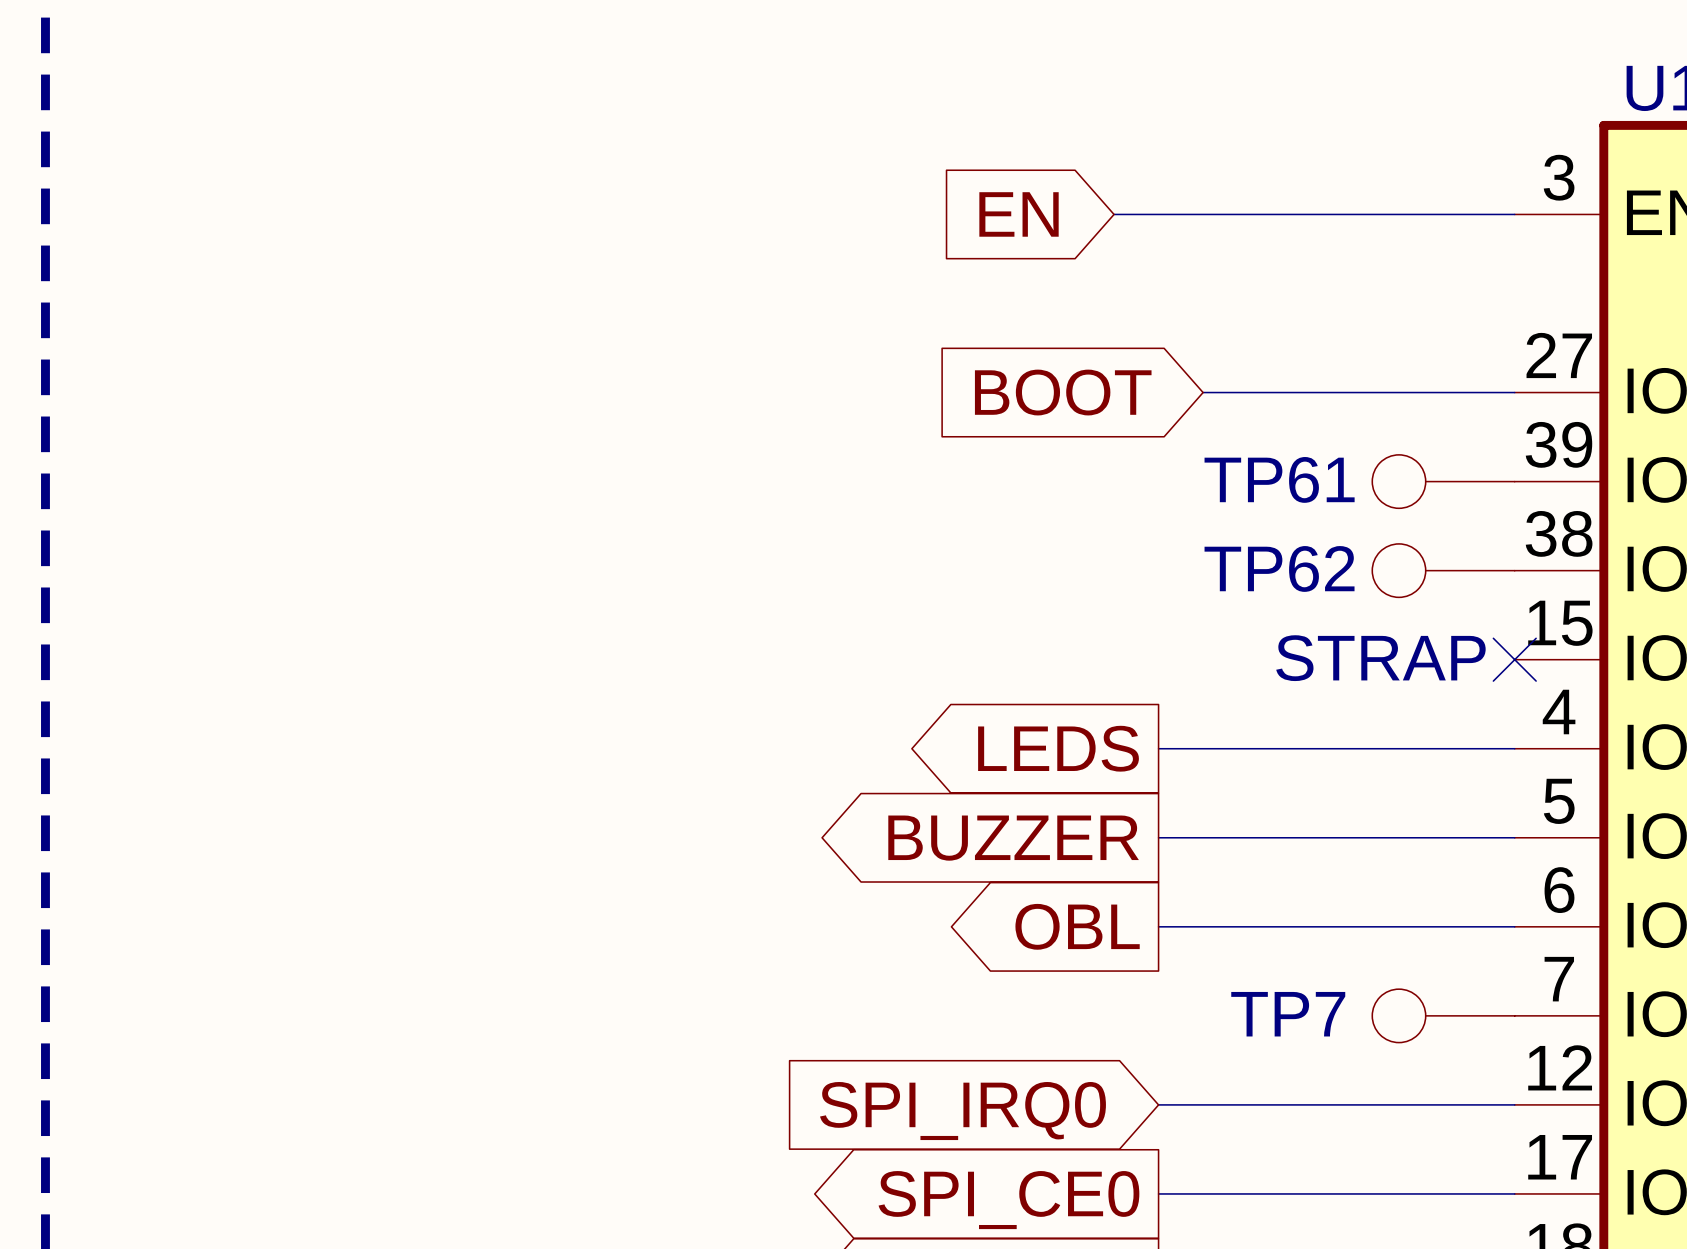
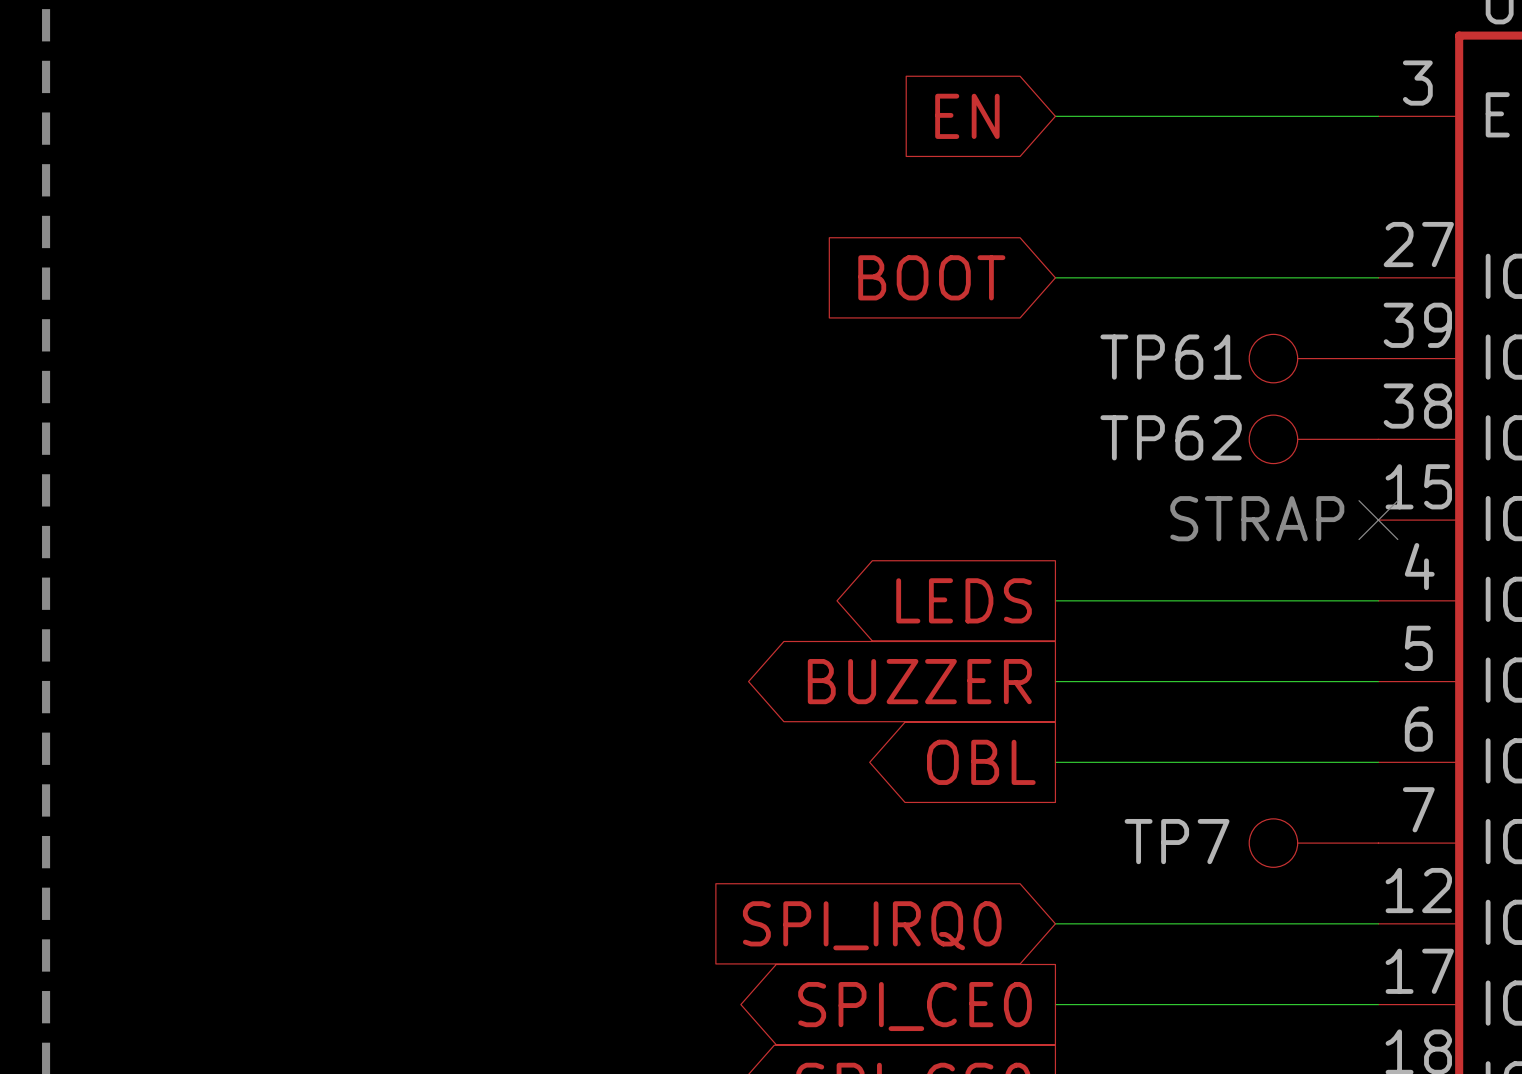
global label position: EN (1019, 214) -> EN (967, 116)
wire: (1114, 214) (1158, 214) -> (1055, 277) (1095, 277)
global label position: BOOT (1063, 392) -> BOOT (931, 277)

